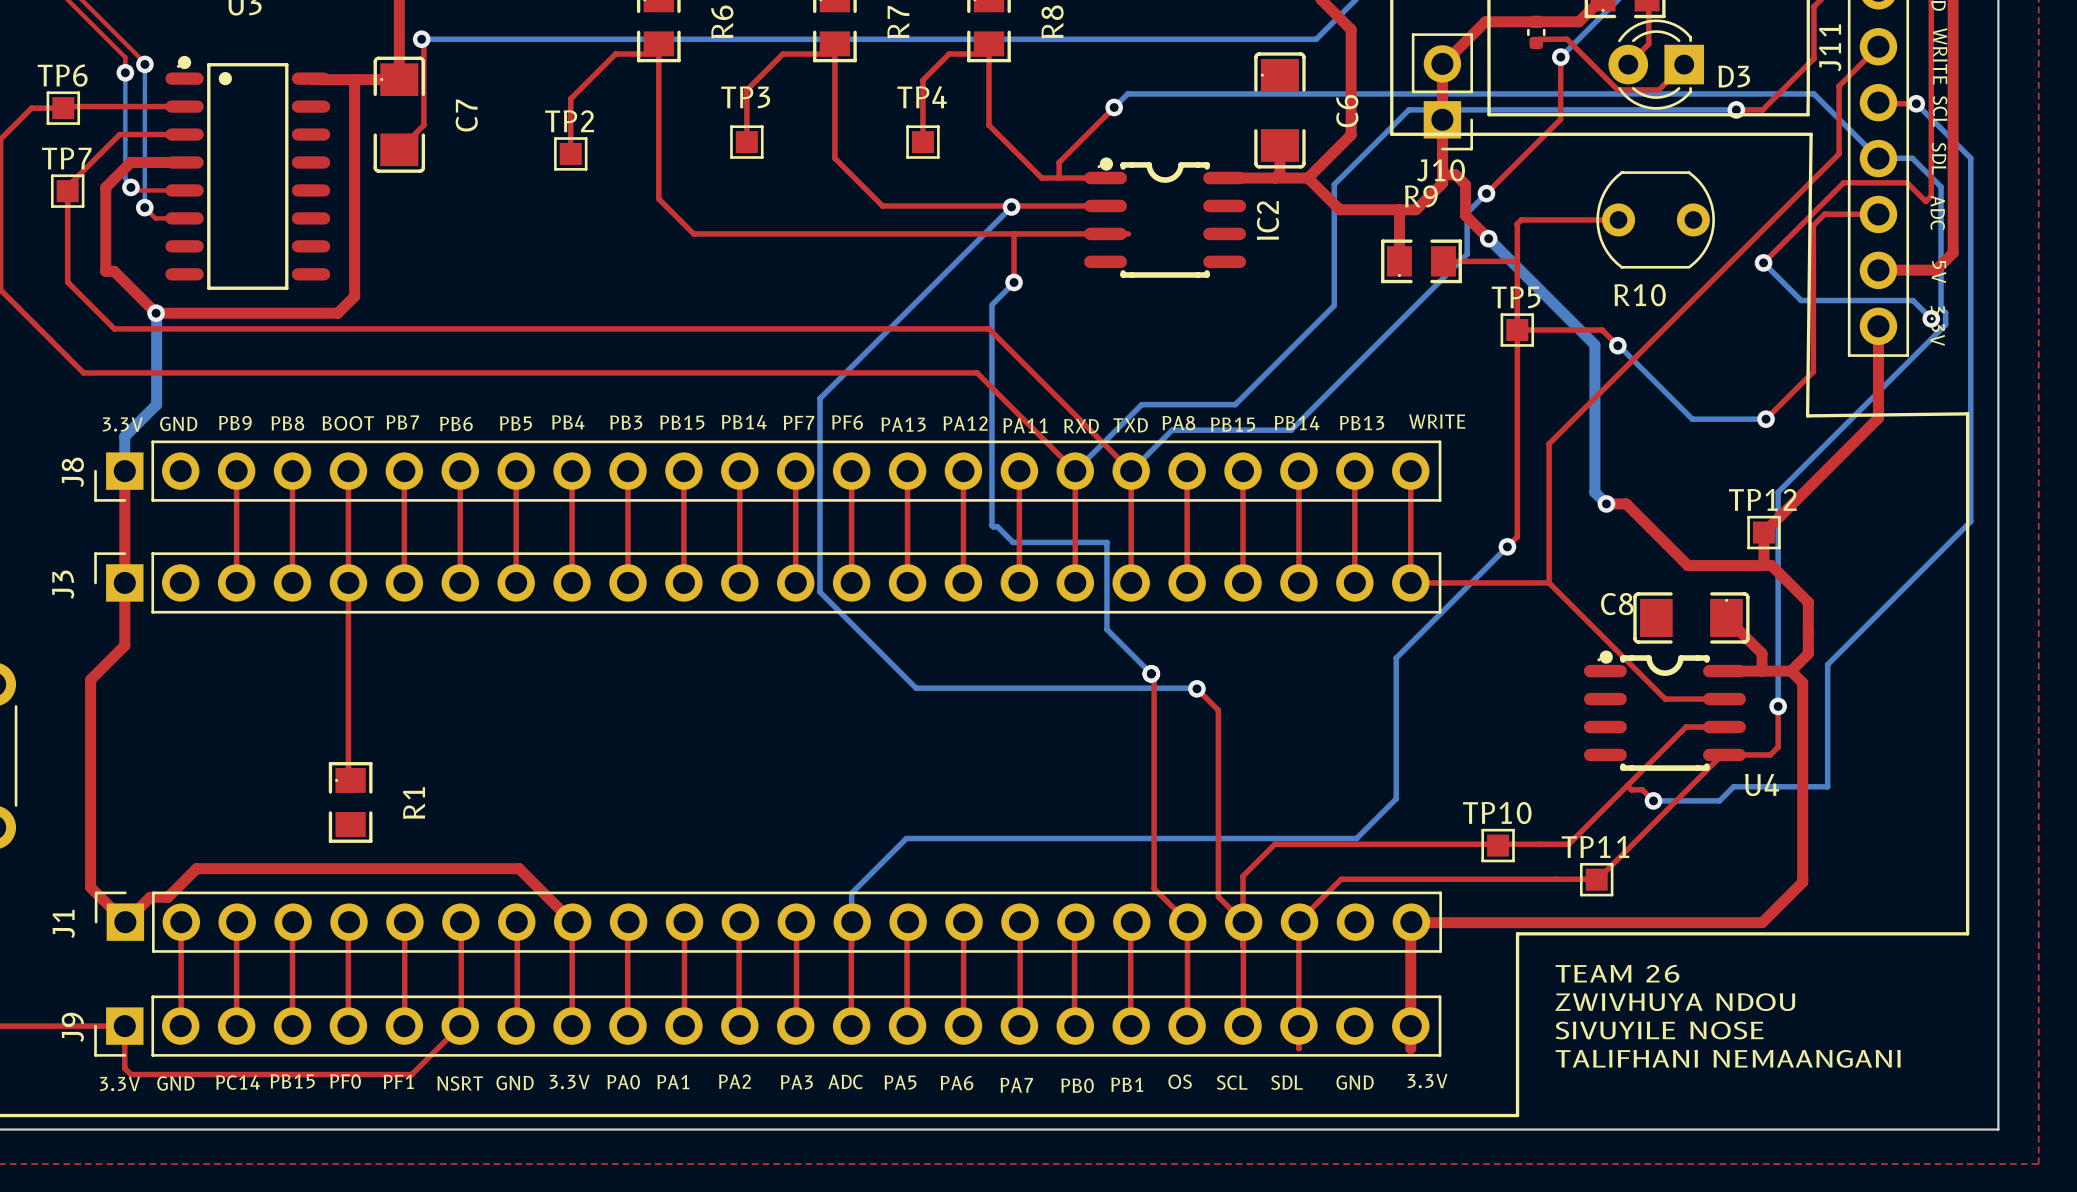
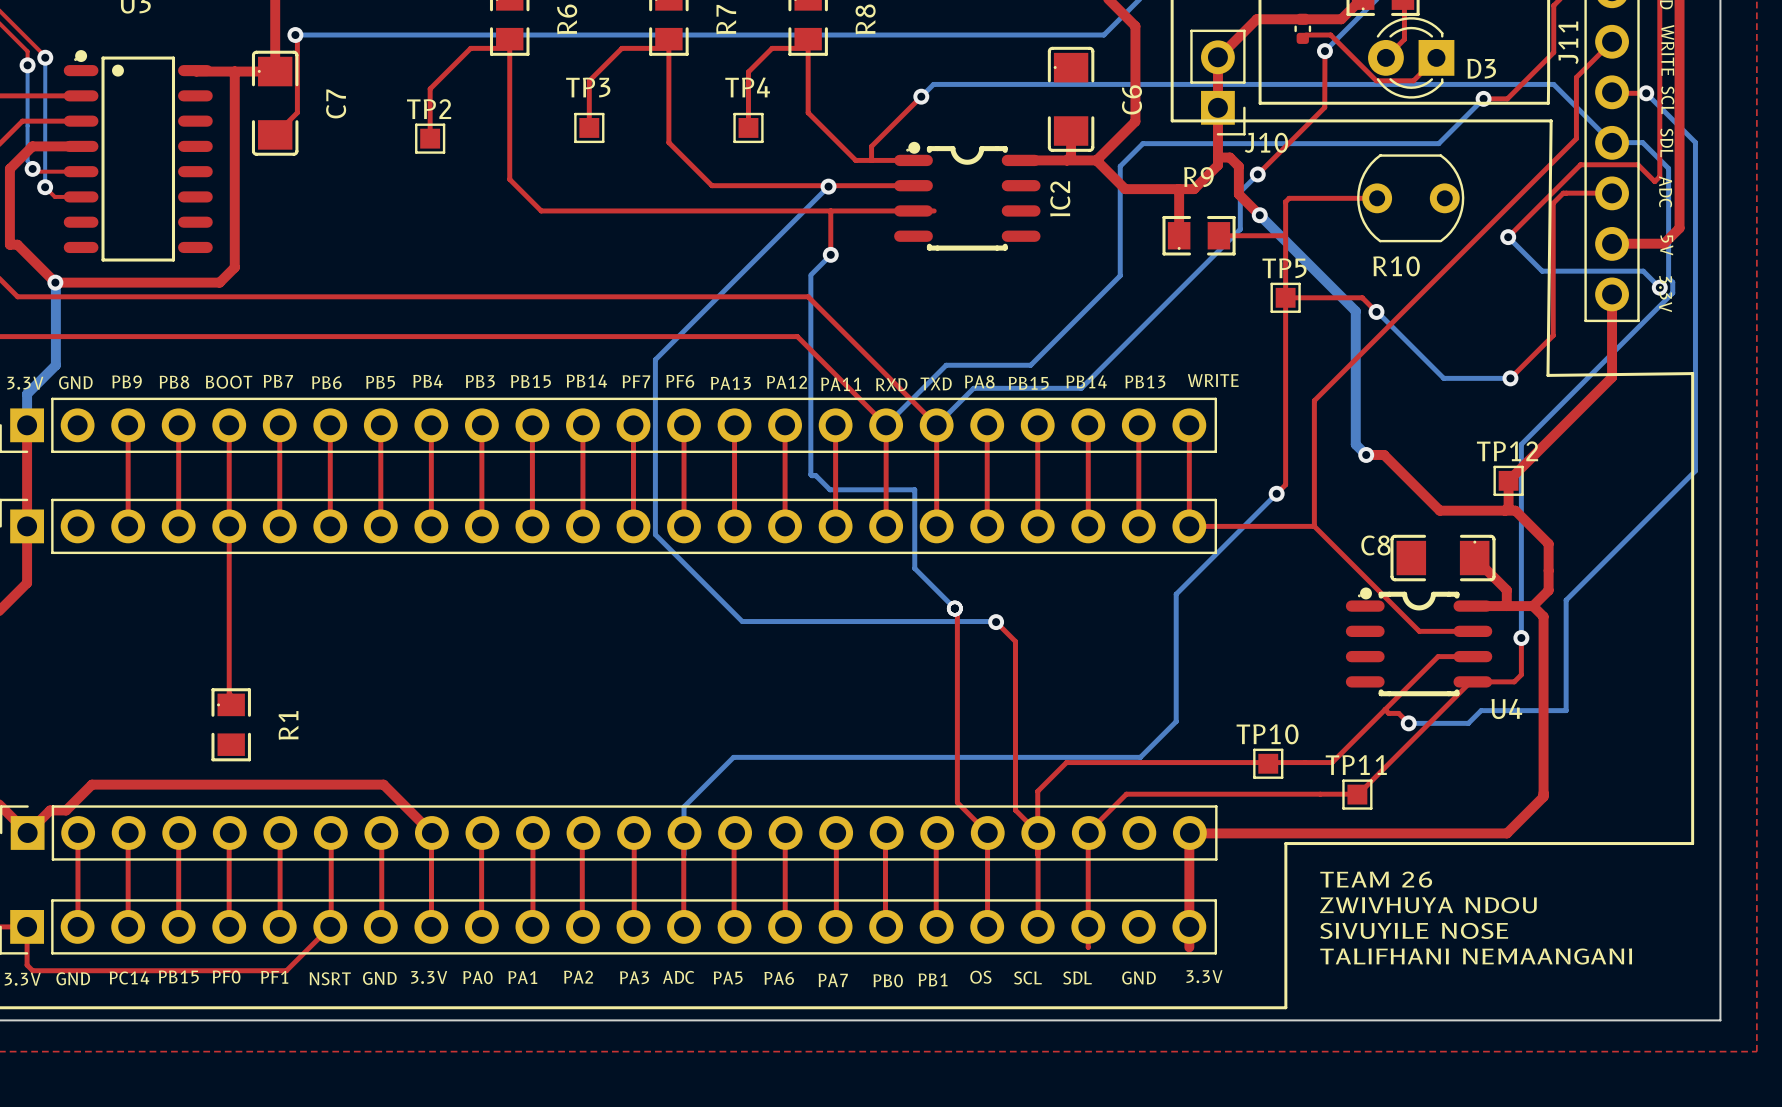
bottom track: (1736, 109) (1408, 109) (1359, 159) -> (1483, 98) (1438, 143) (1142, 143)
J10 name position: J10 (1441, 170) -> J10 (1266, 142)

